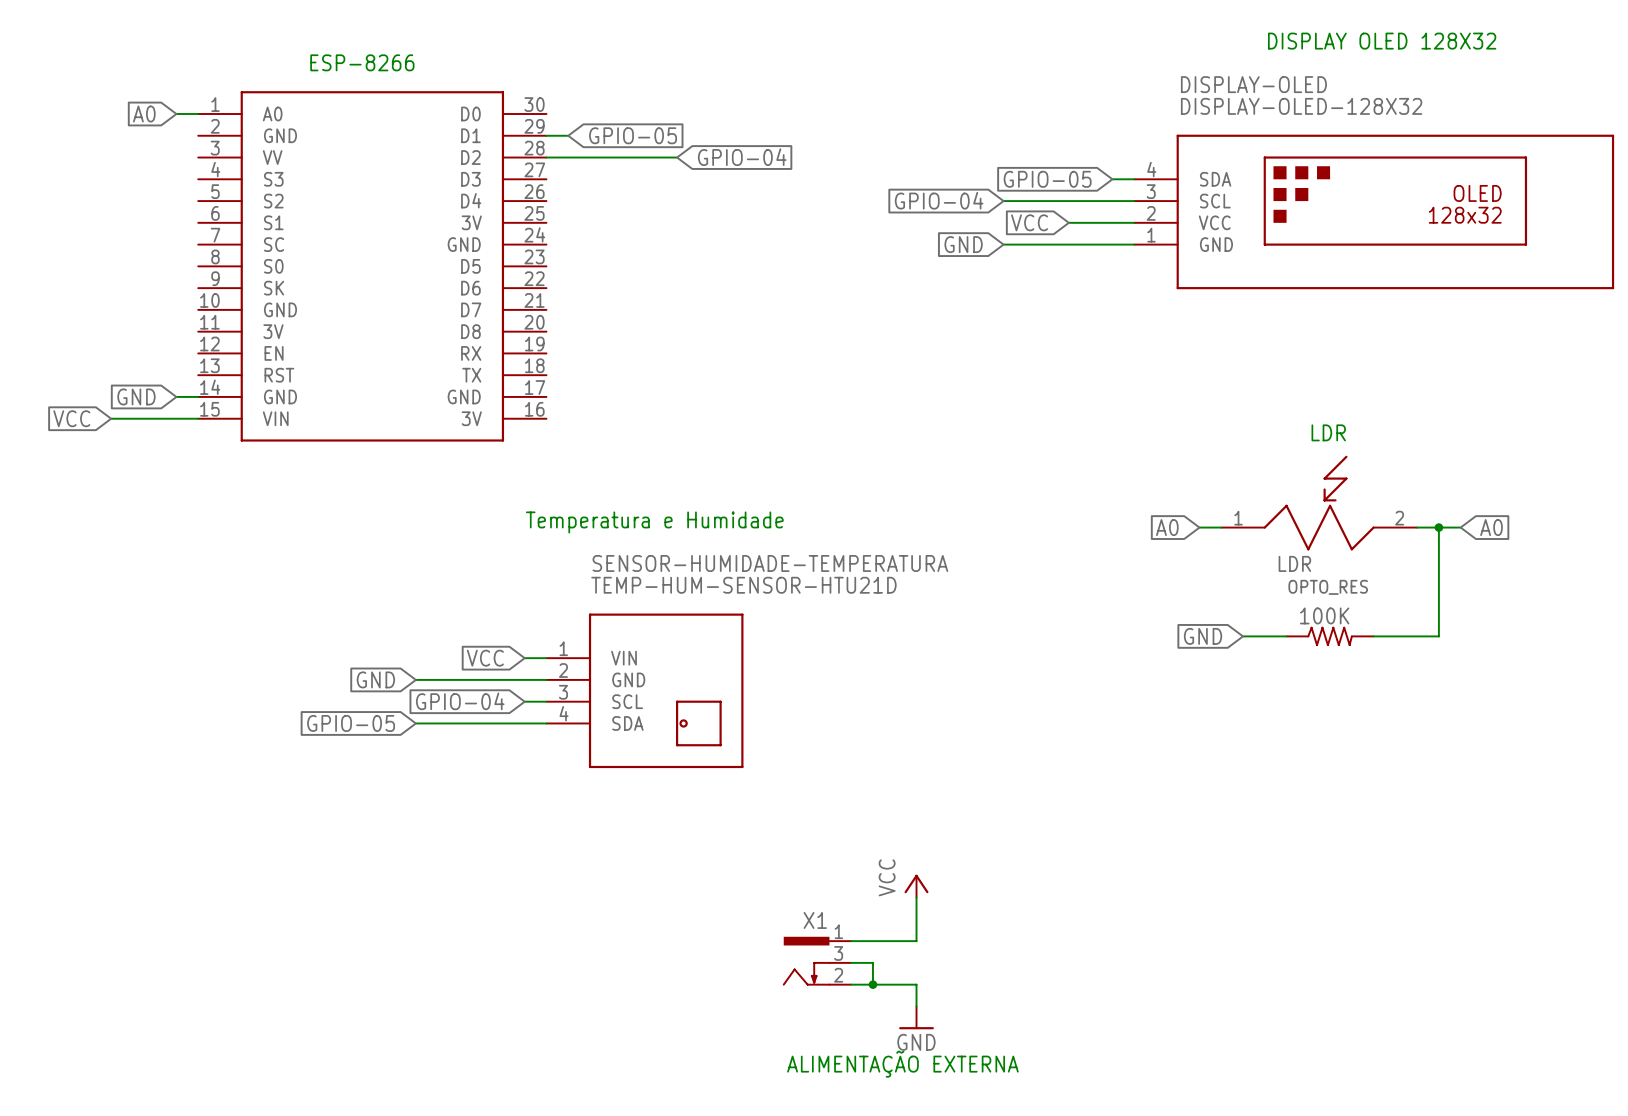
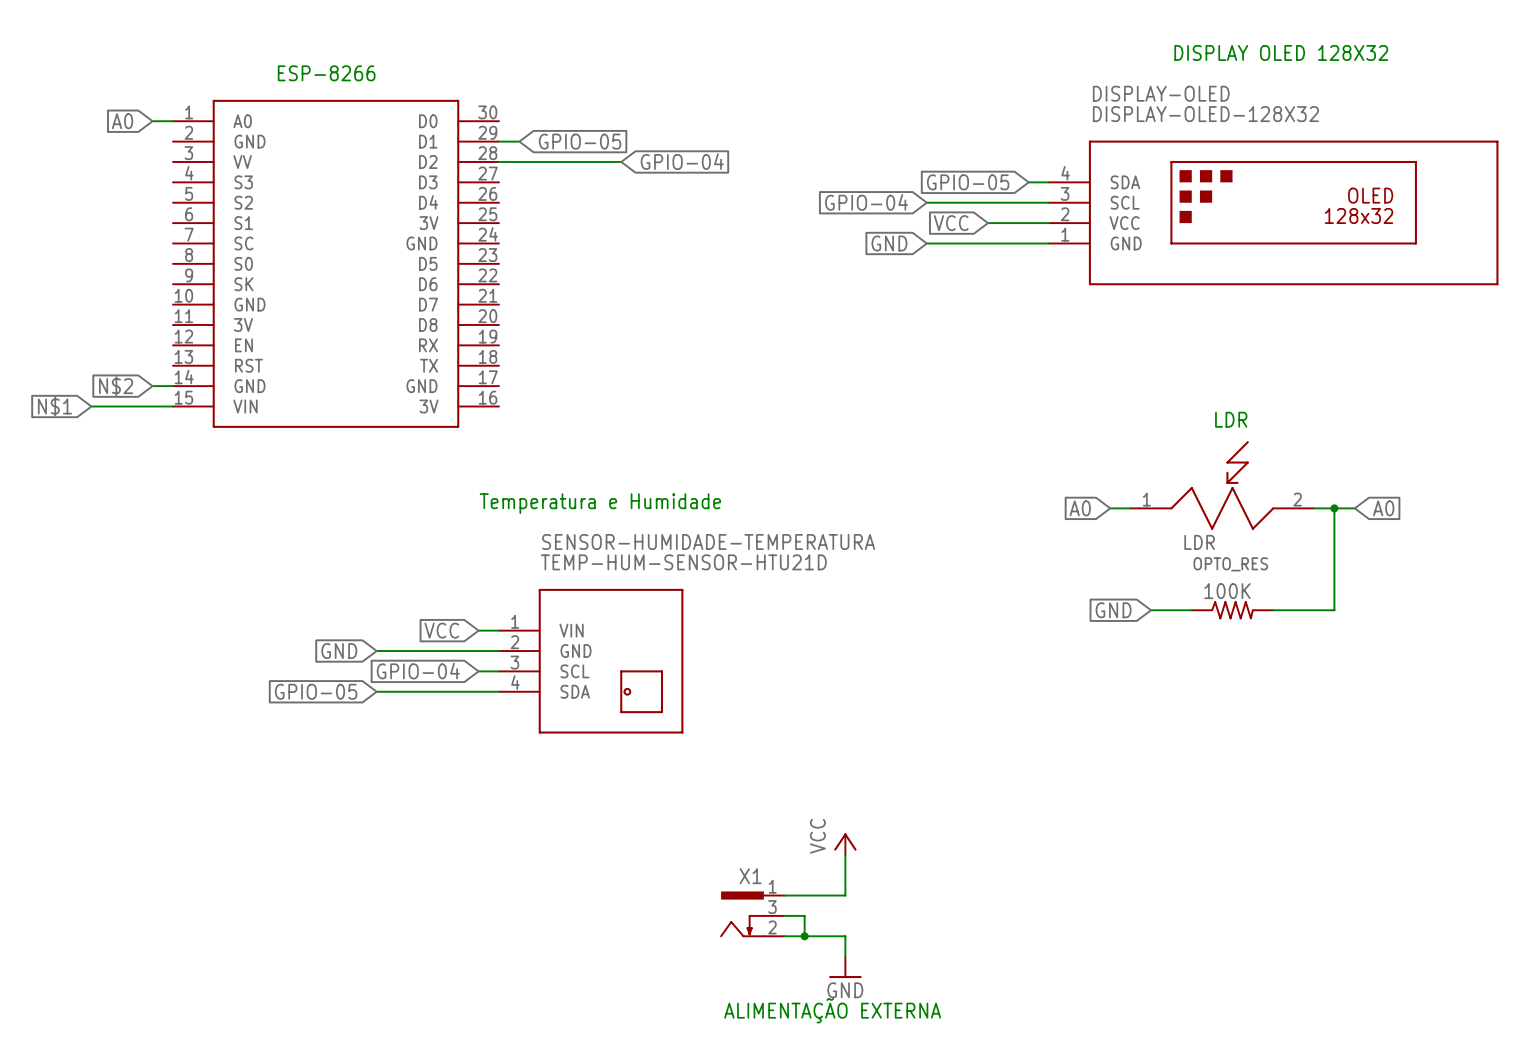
global label: GND (136, 396) -> N$2 (116, 386)
global label: VCC (71, 418) -> N$1 (54, 406)

